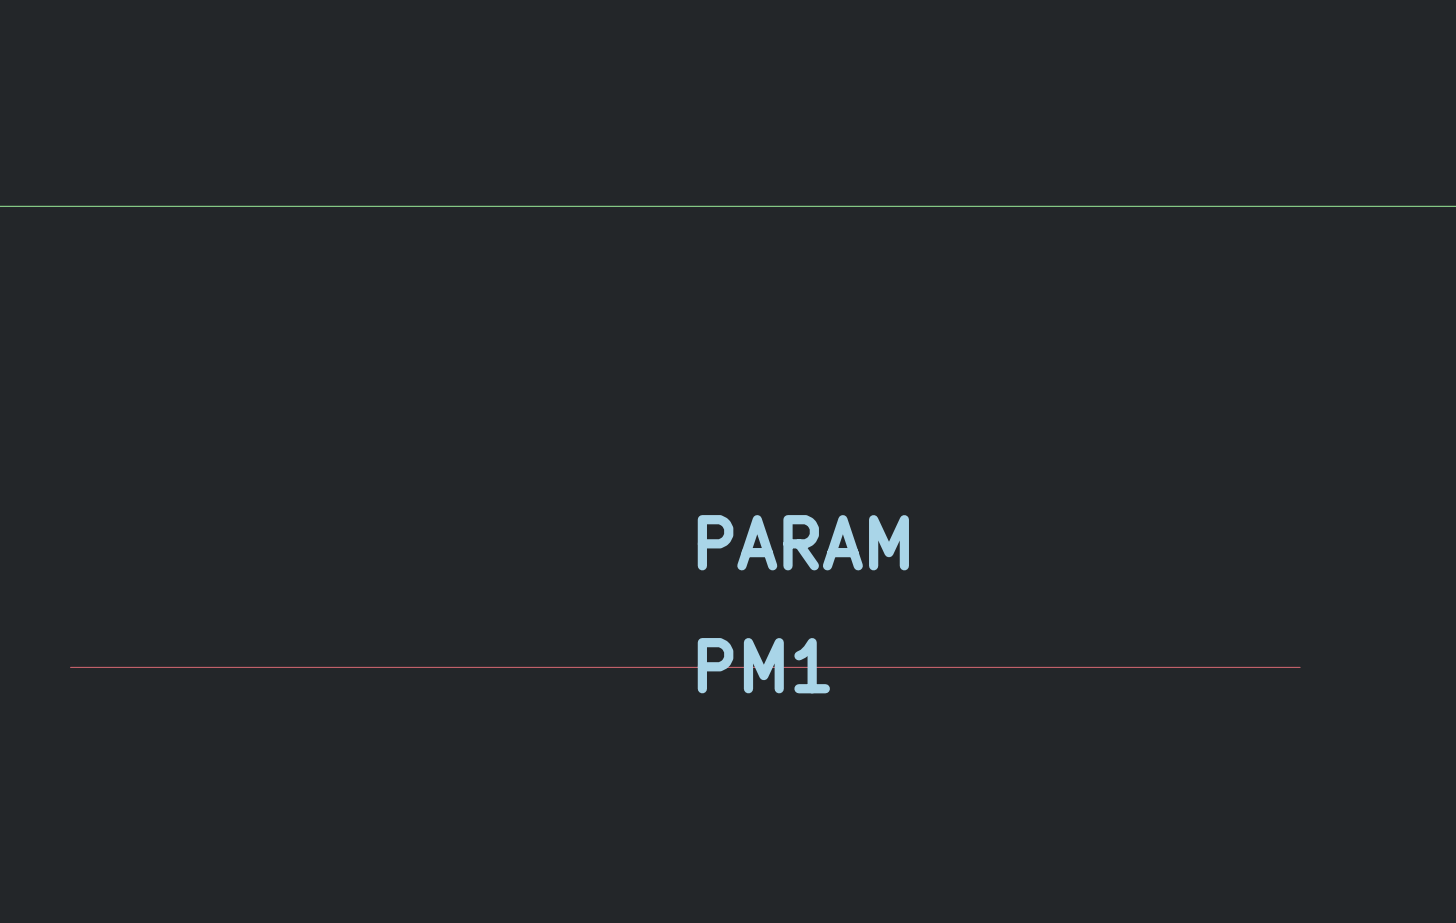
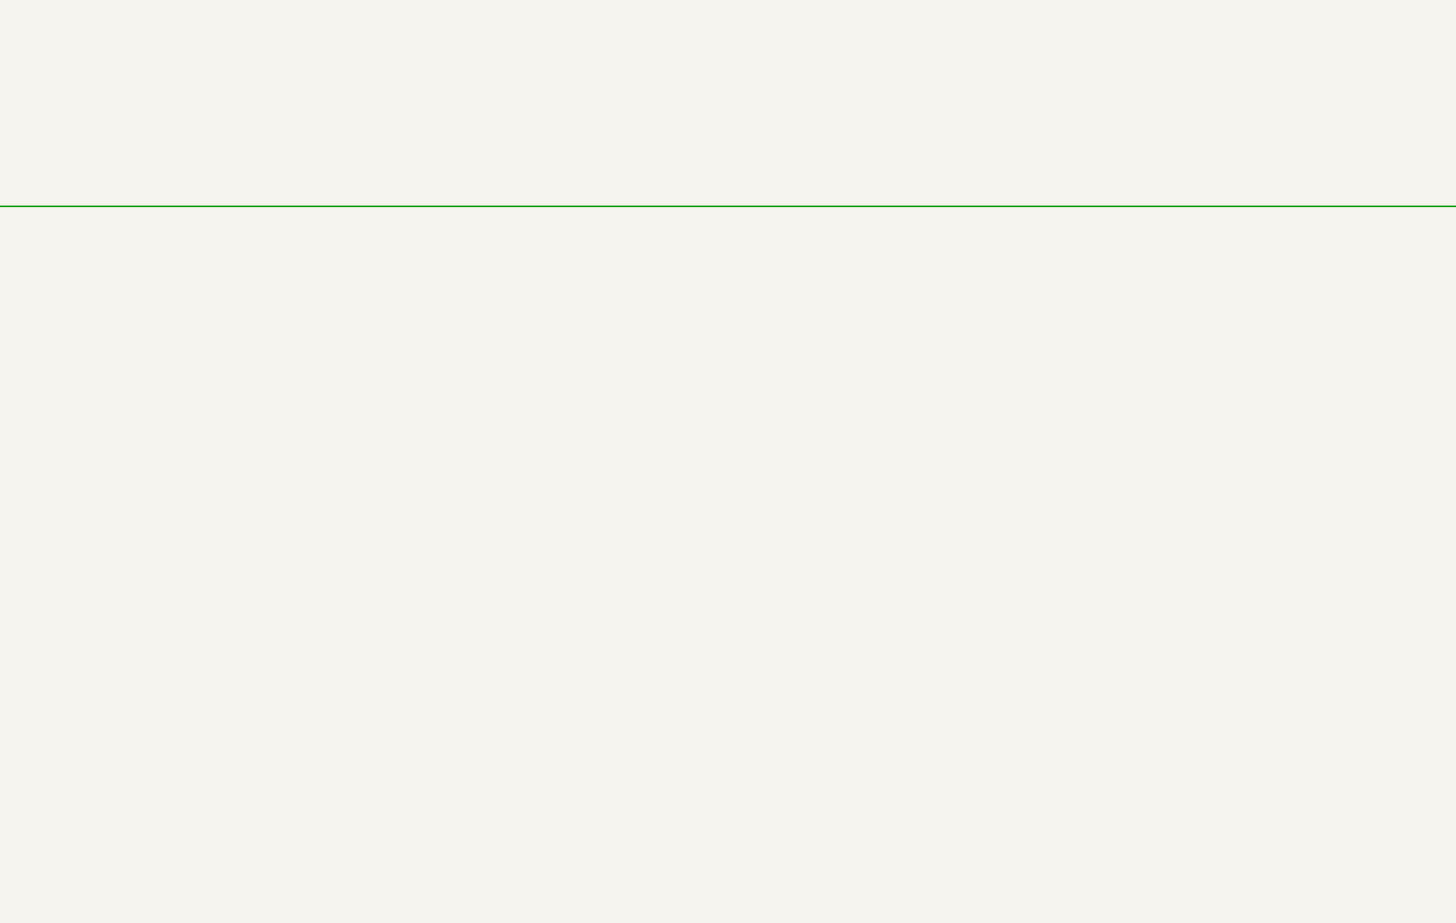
PM1: PARAM (685, 667) -> none

